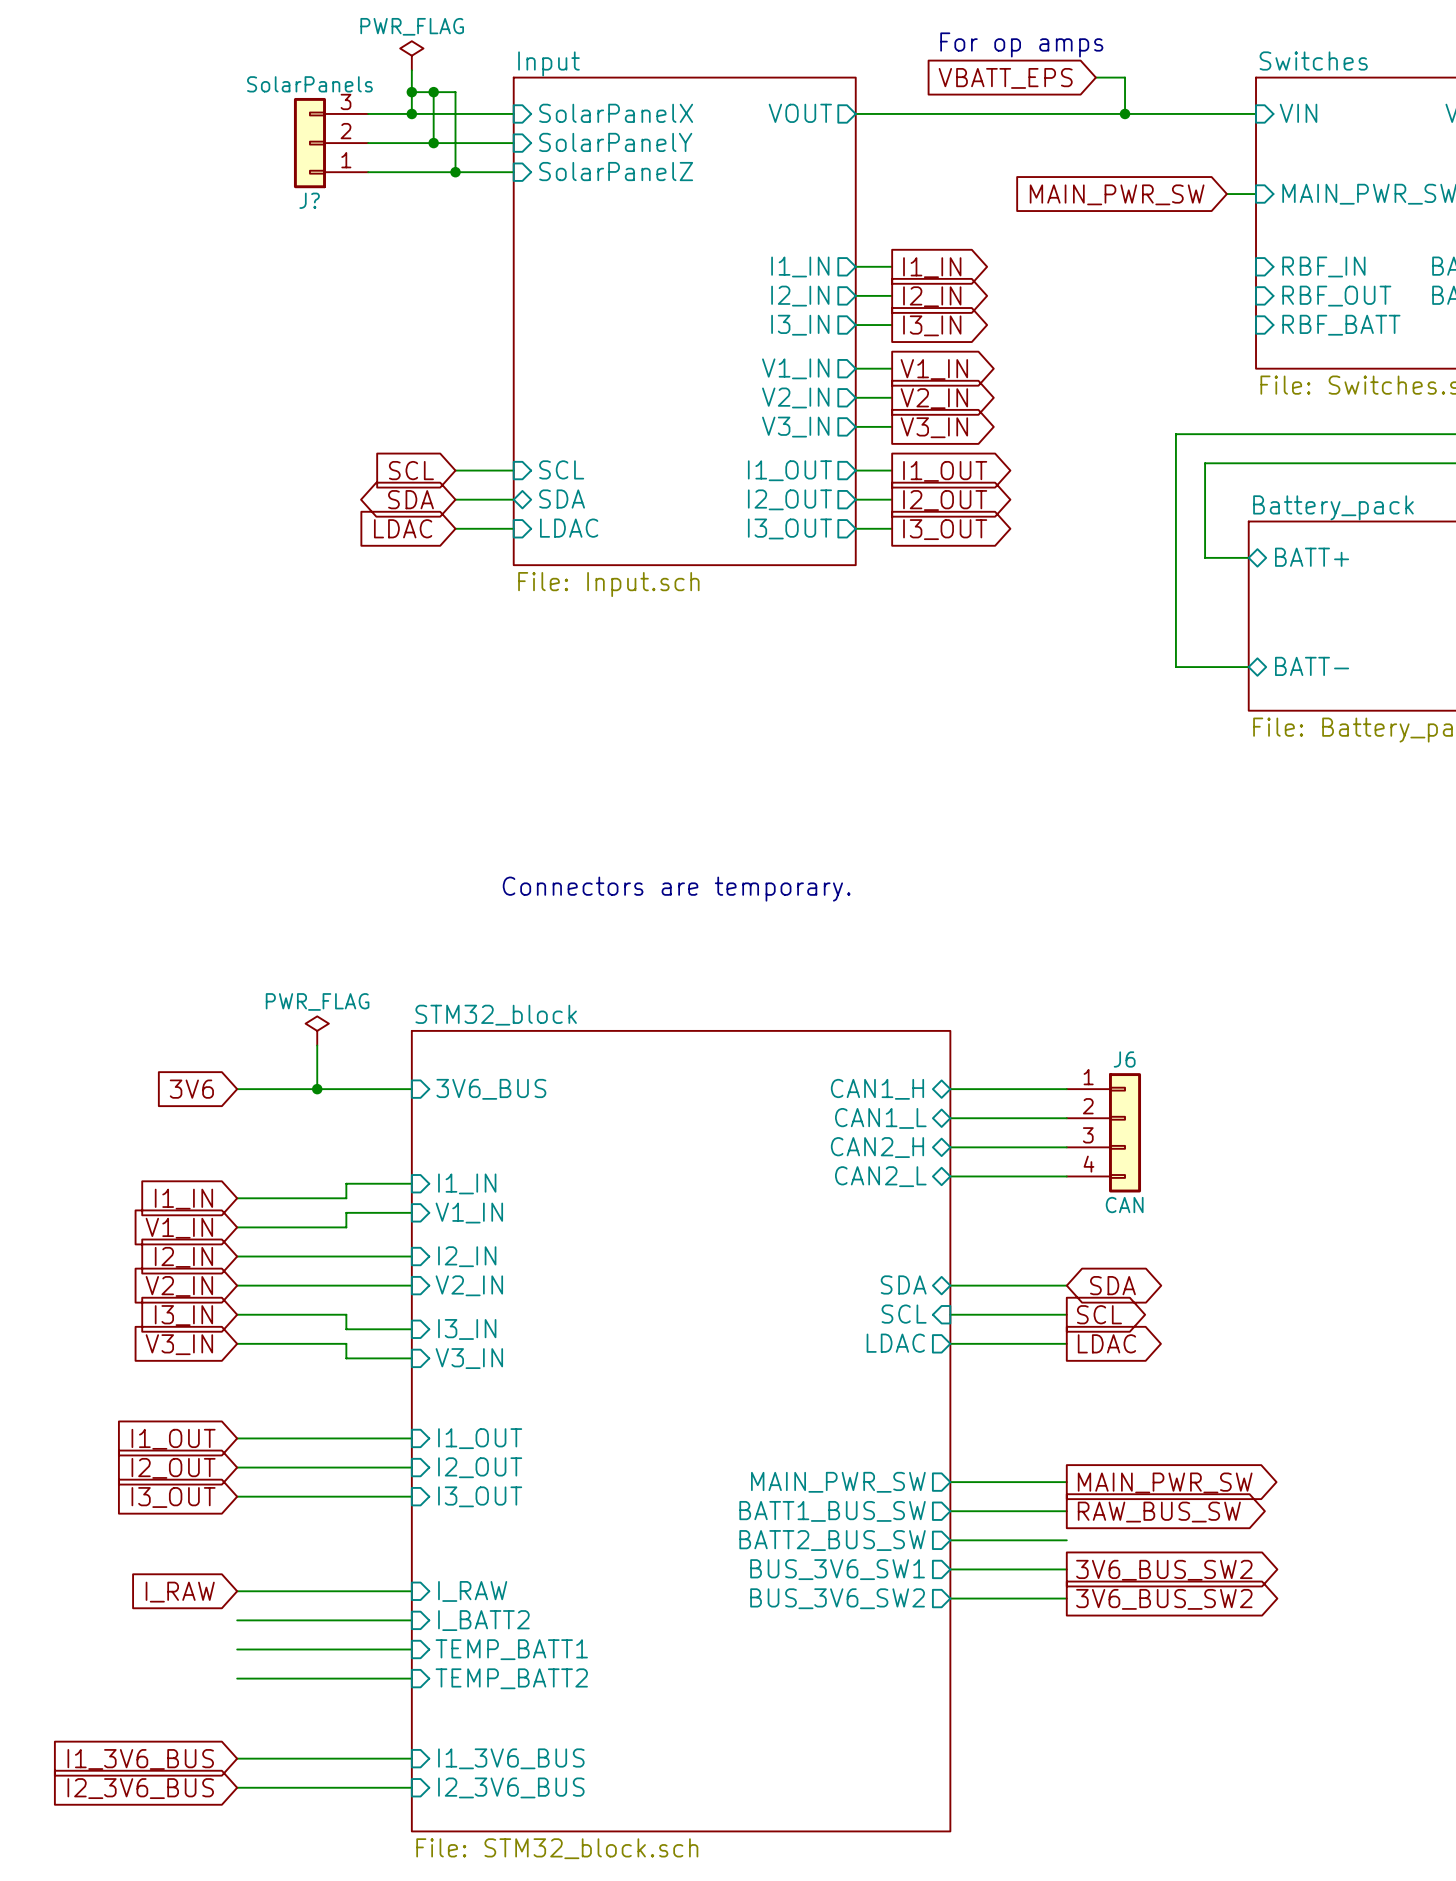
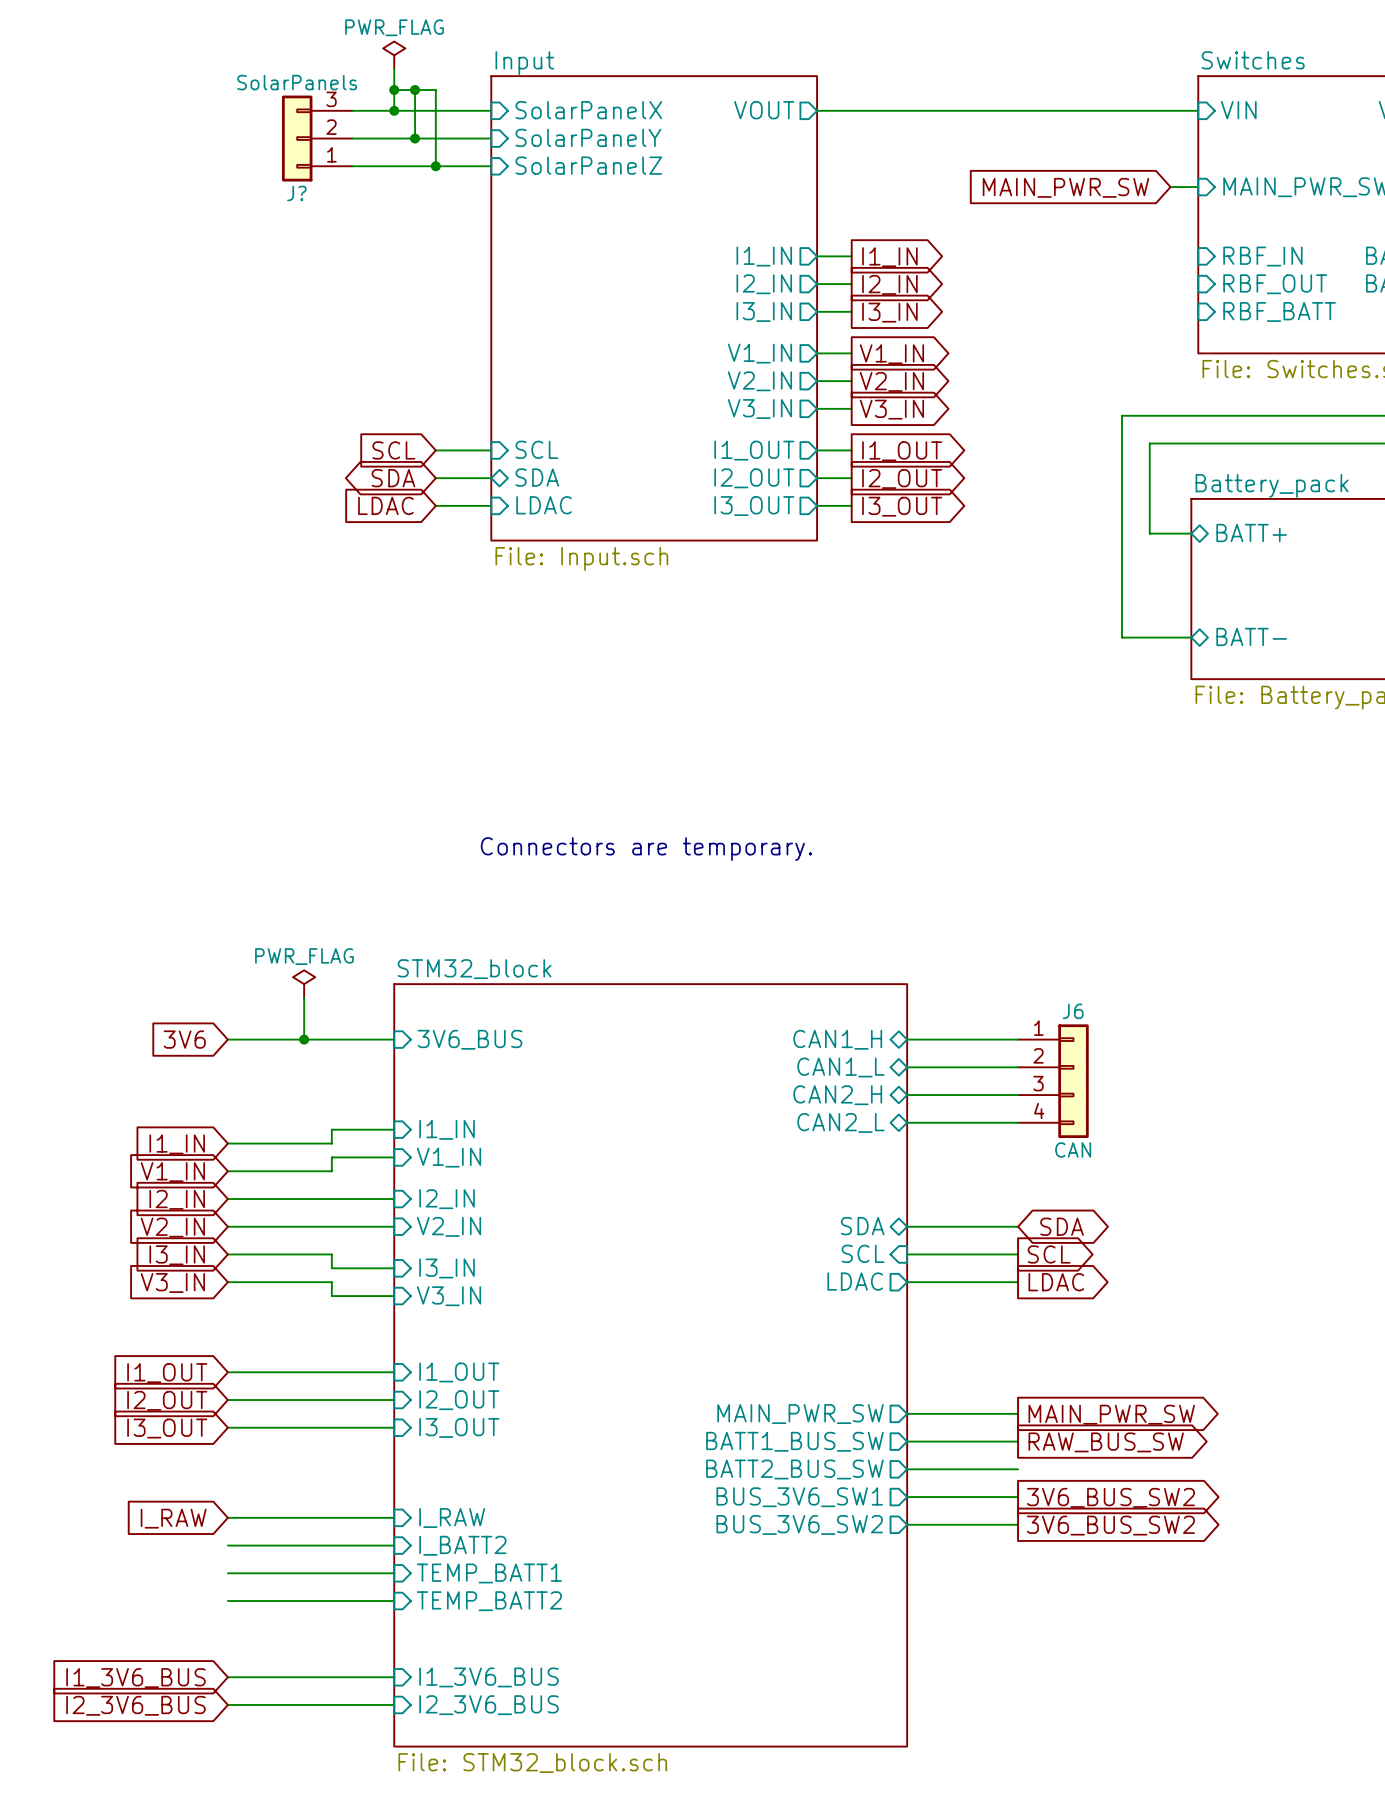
text: For op amps (1021, 44) -> none
wire: (1095, 77) (1125, 77) (1125, 113) -> none
global label: VBATT_EPS (1005, 78) -> none
junction: (1125, 113) -> none

